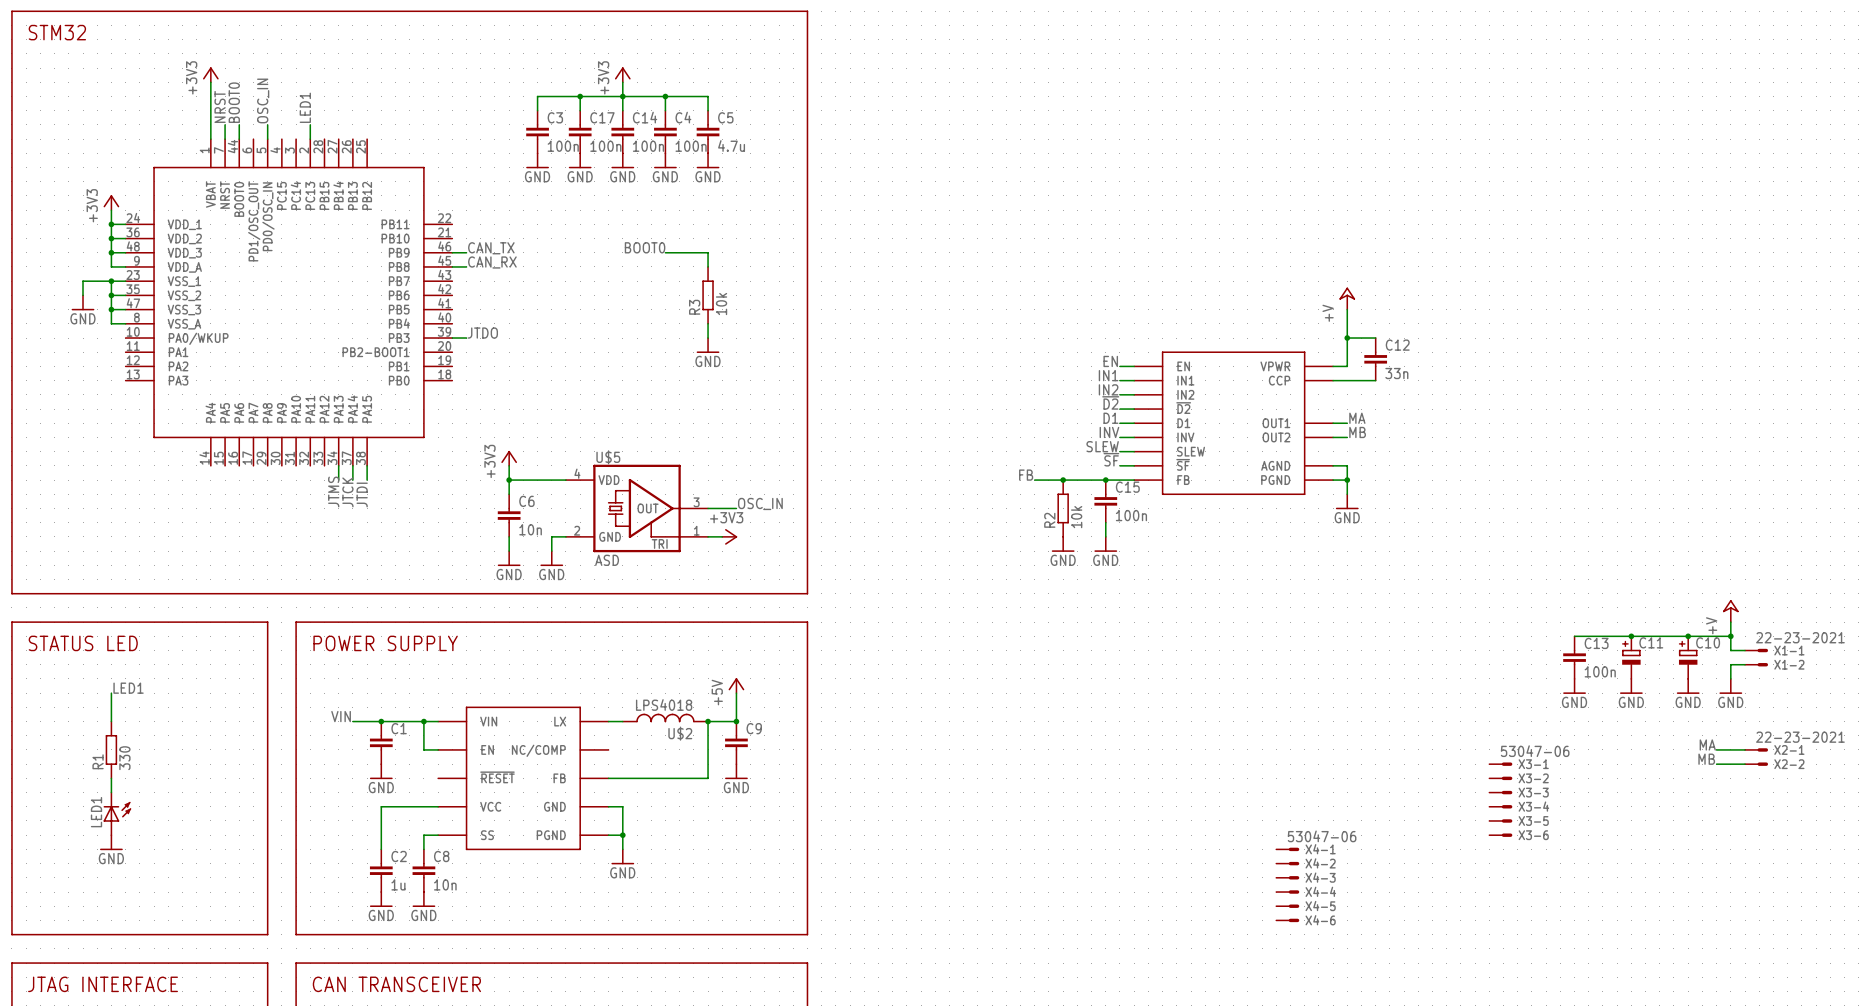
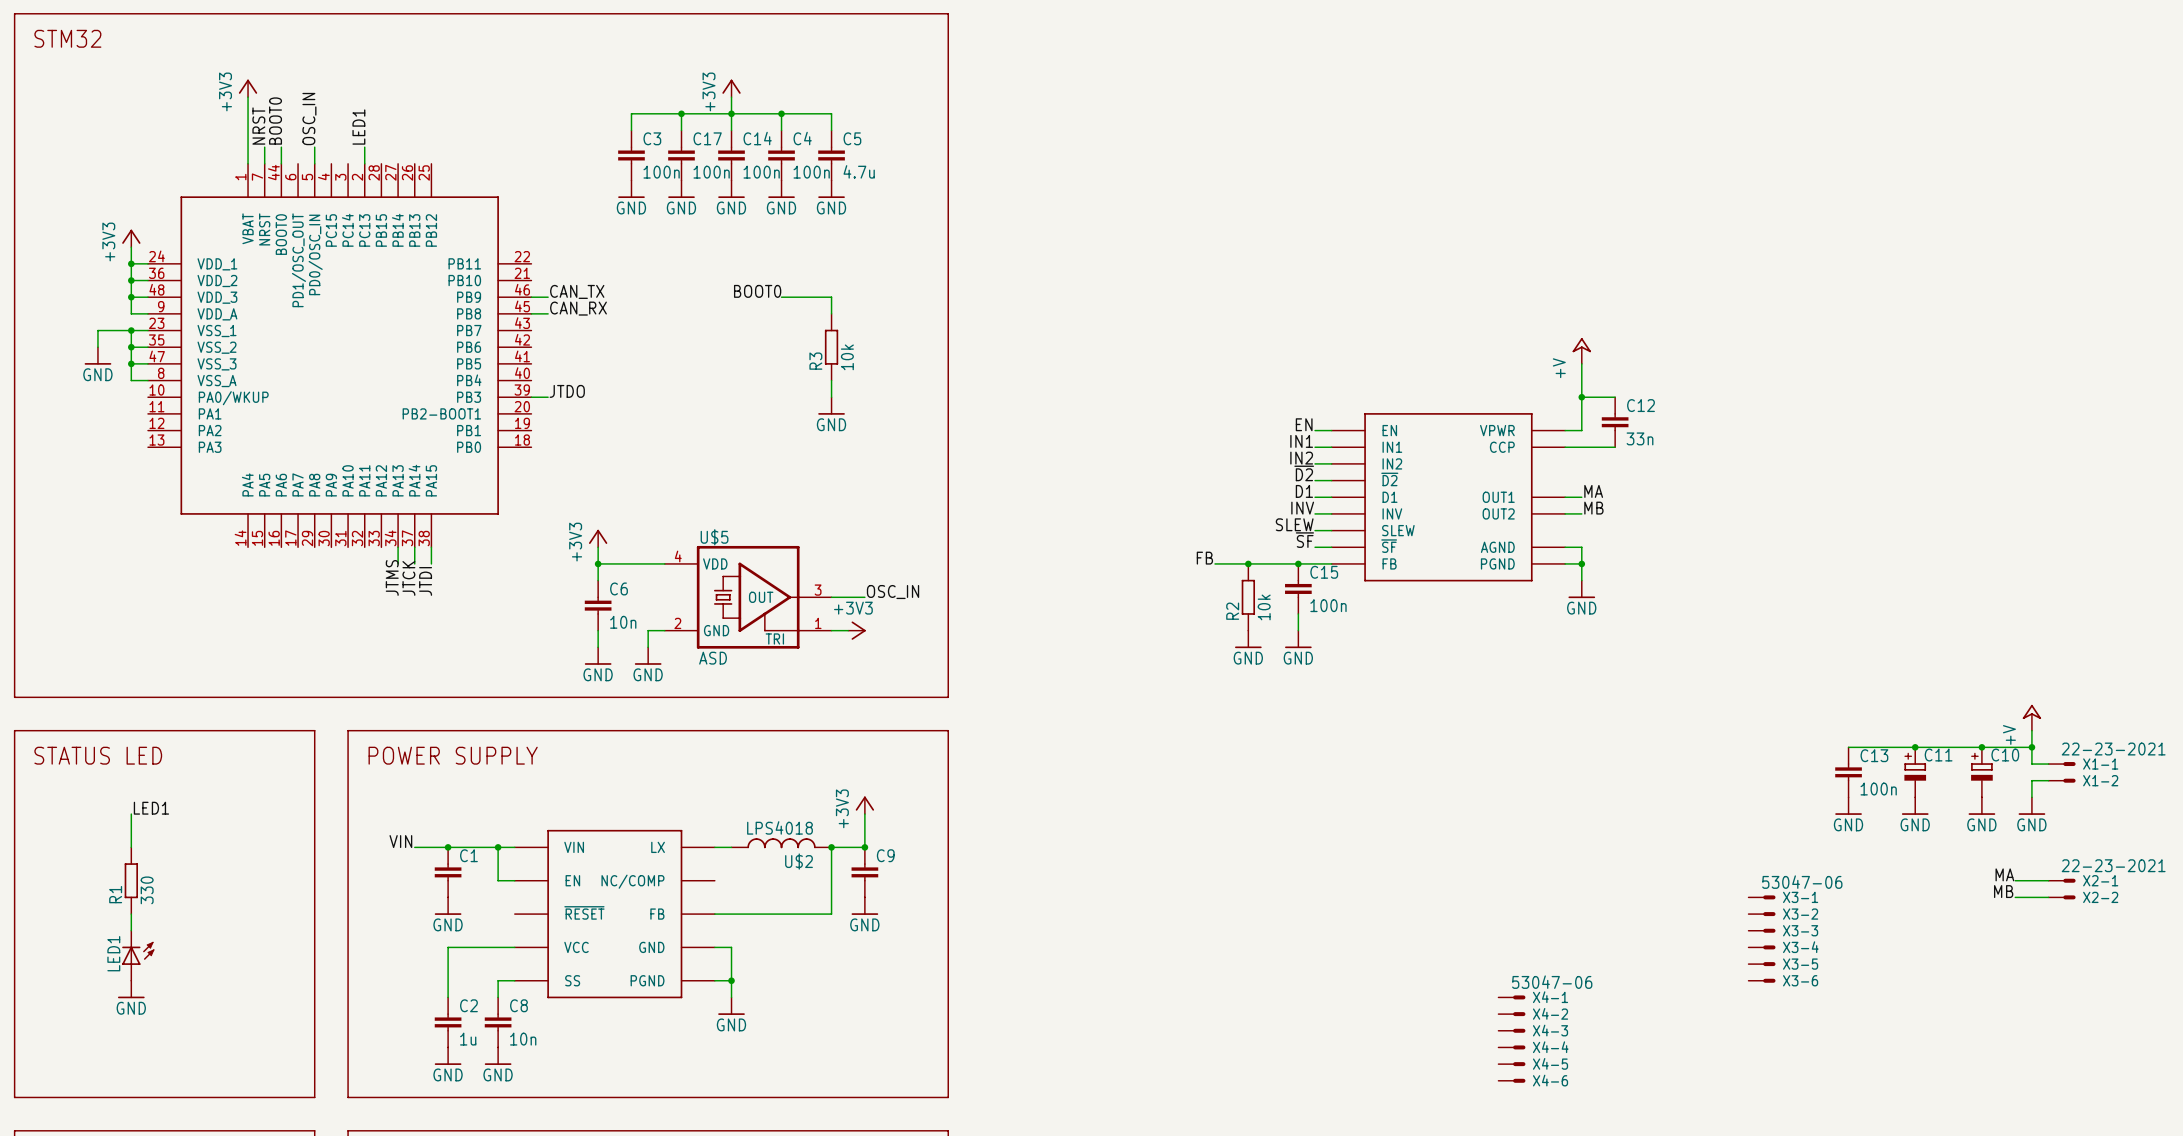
power symbol: +5V (736, 685) -> +3V3 (864, 805)

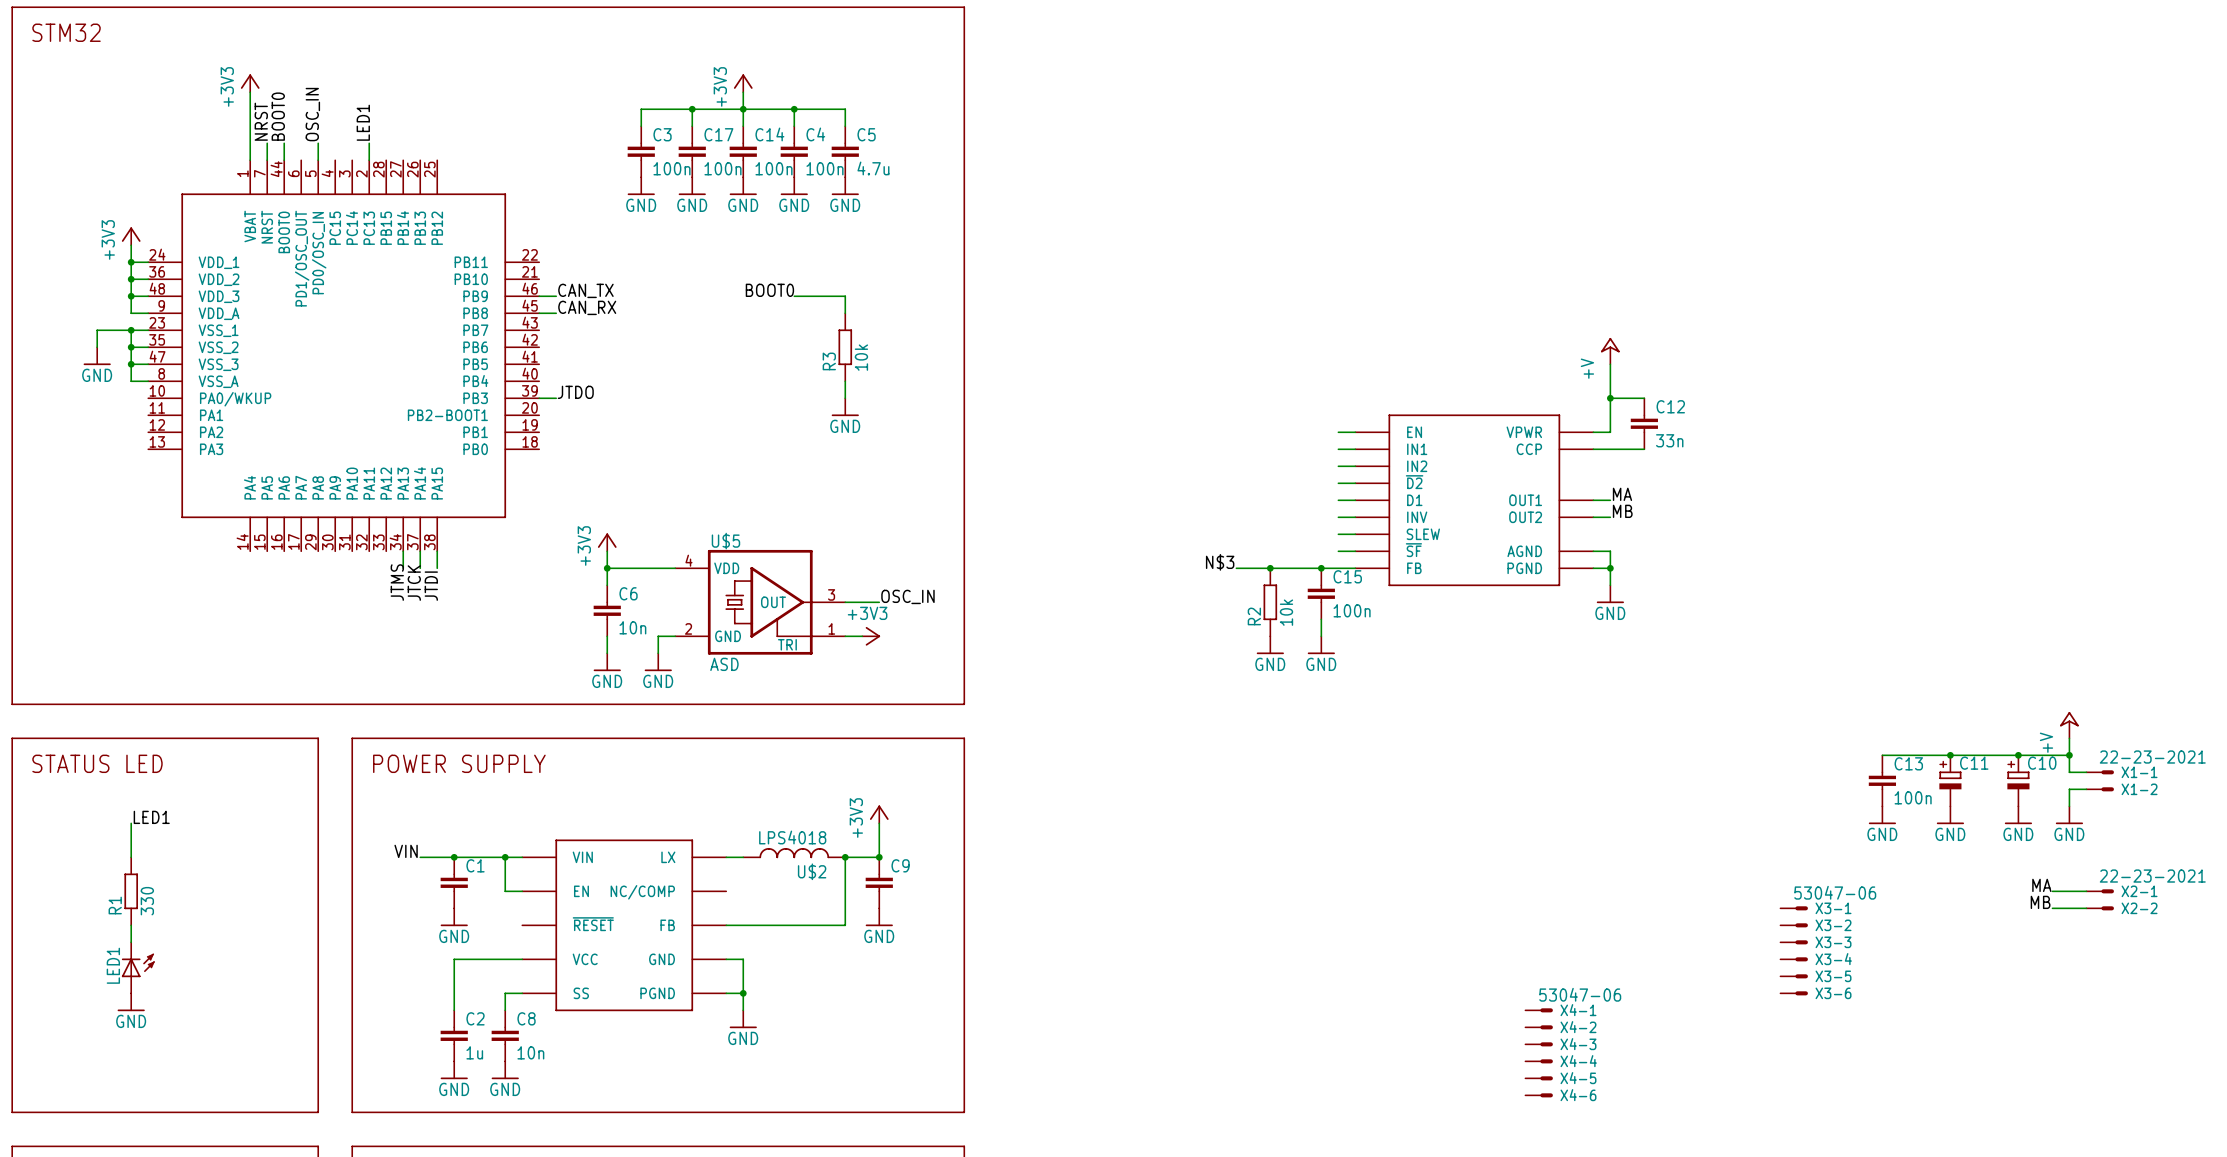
label: EN (1304, 424) -> none
label: IN1 (1301, 441) -> none
label: IN2 (1301, 458) -> none
label: ~{D2} (1304, 473) -> none
label: D1 (1304, 491) -> none
label: INV (1302, 508) -> none
label: SLEW (1294, 524) -> none
label: ~{SF} (1304, 540) -> none
label: FB (1204, 558) -> N$3 (1220, 562)

